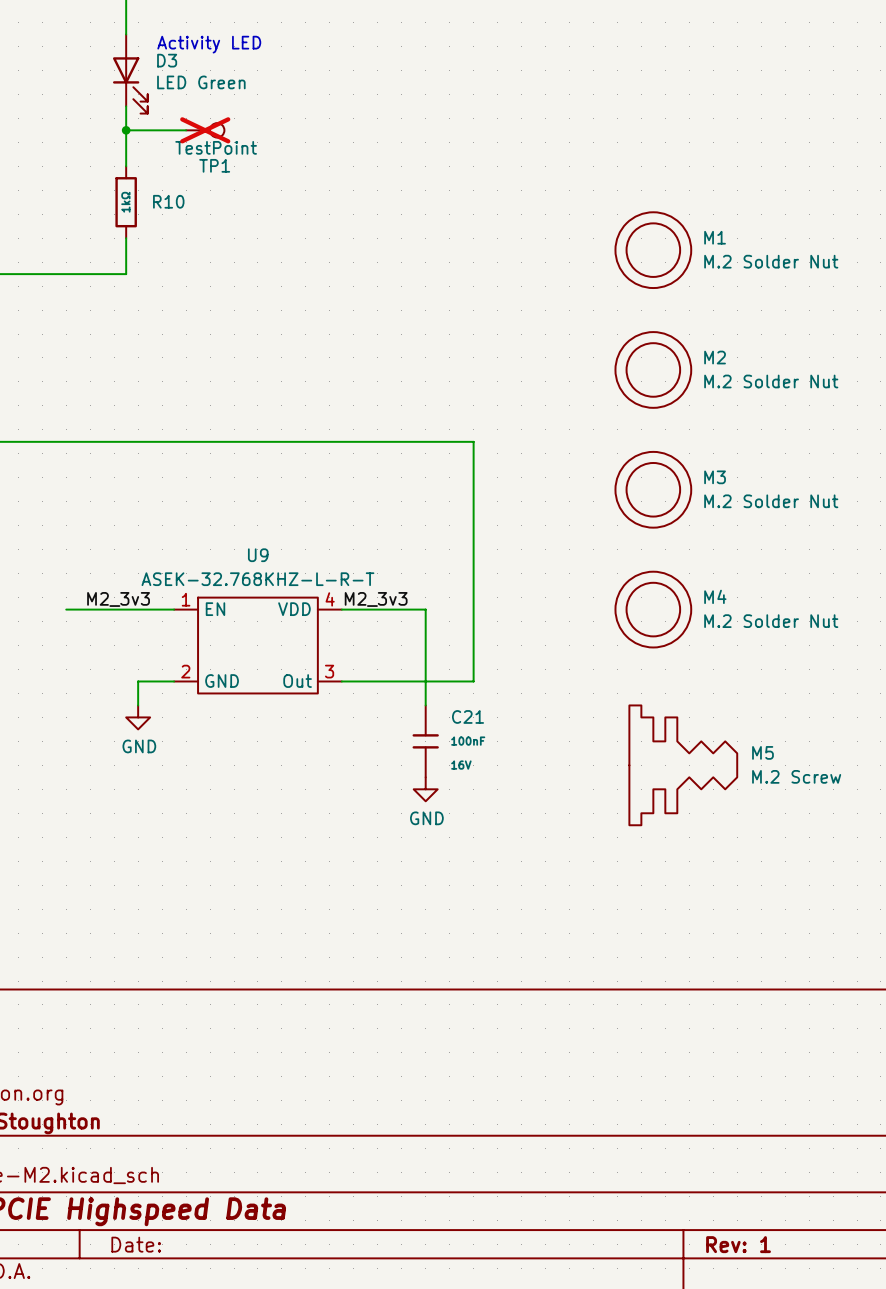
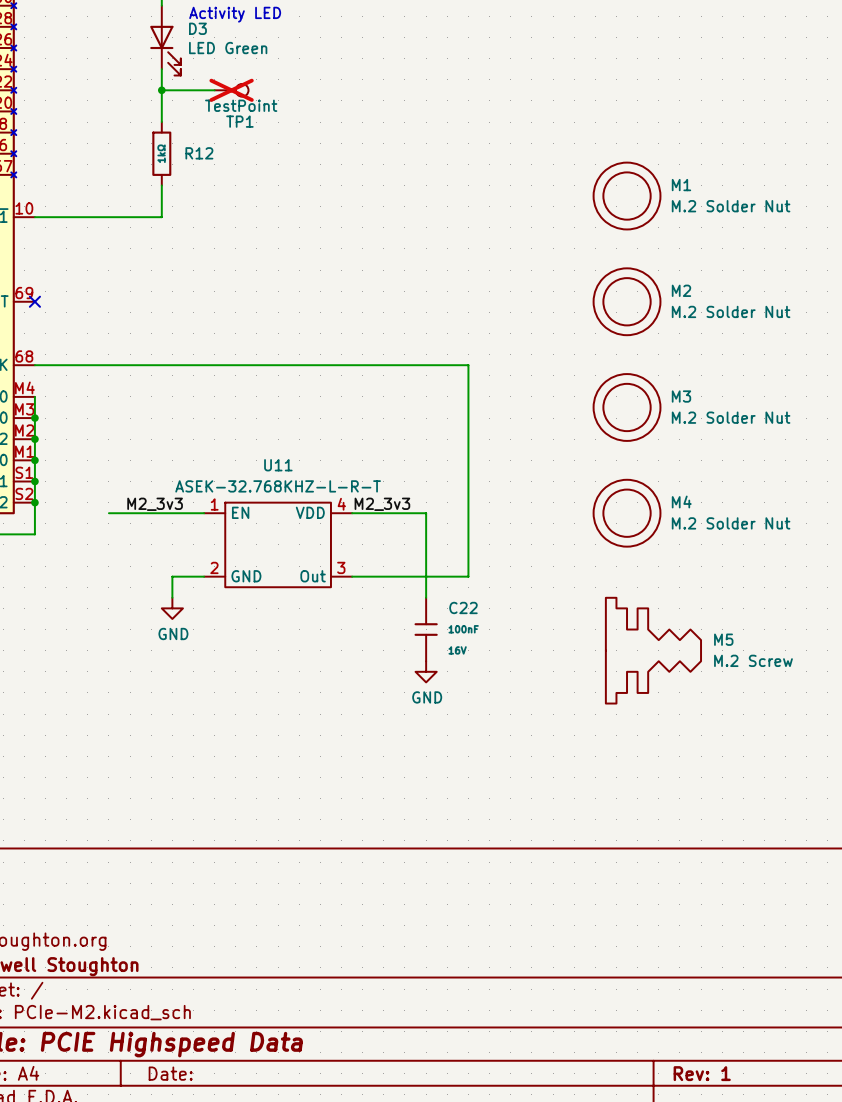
R10 name: R10 (168, 201) -> R12 (199, 153)
U9 name: U9 (258, 555) -> U11 (278, 465)
C21 name: C21 (468, 716) -> C22 (463, 607)

